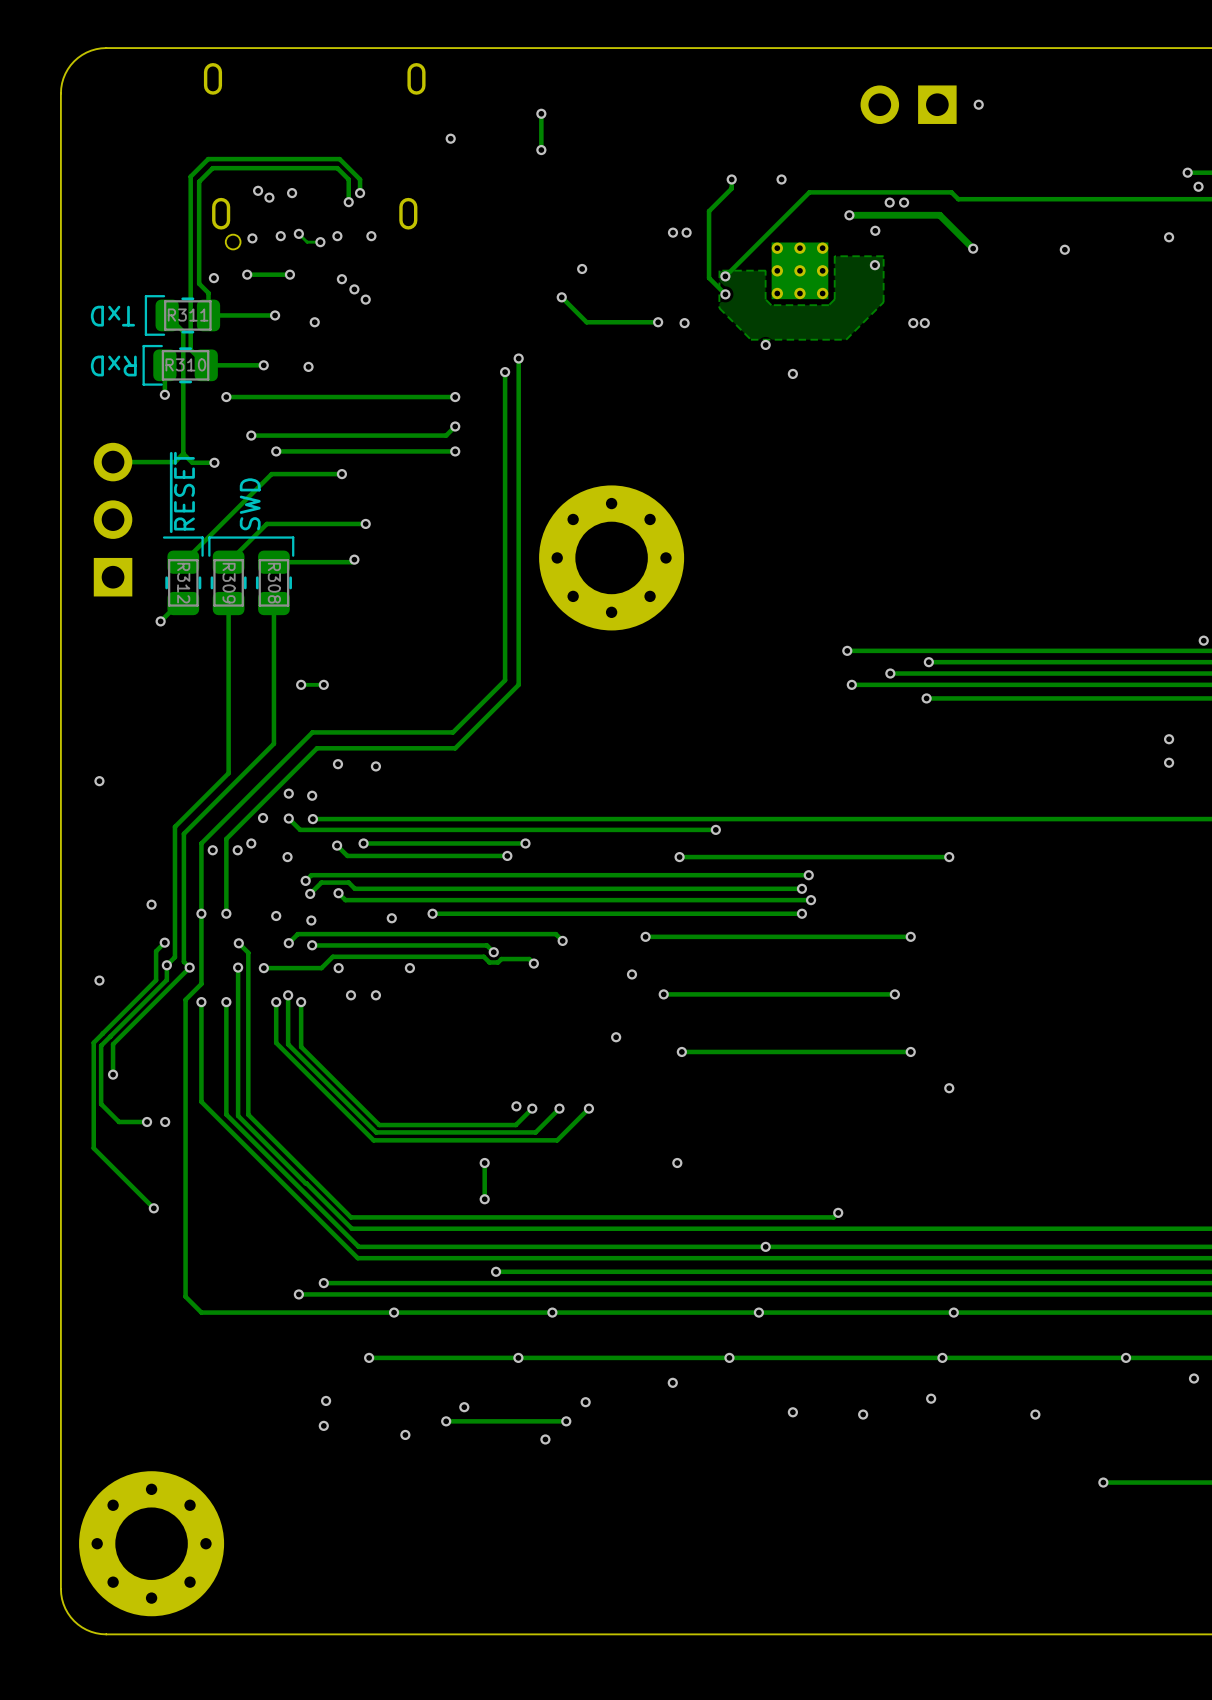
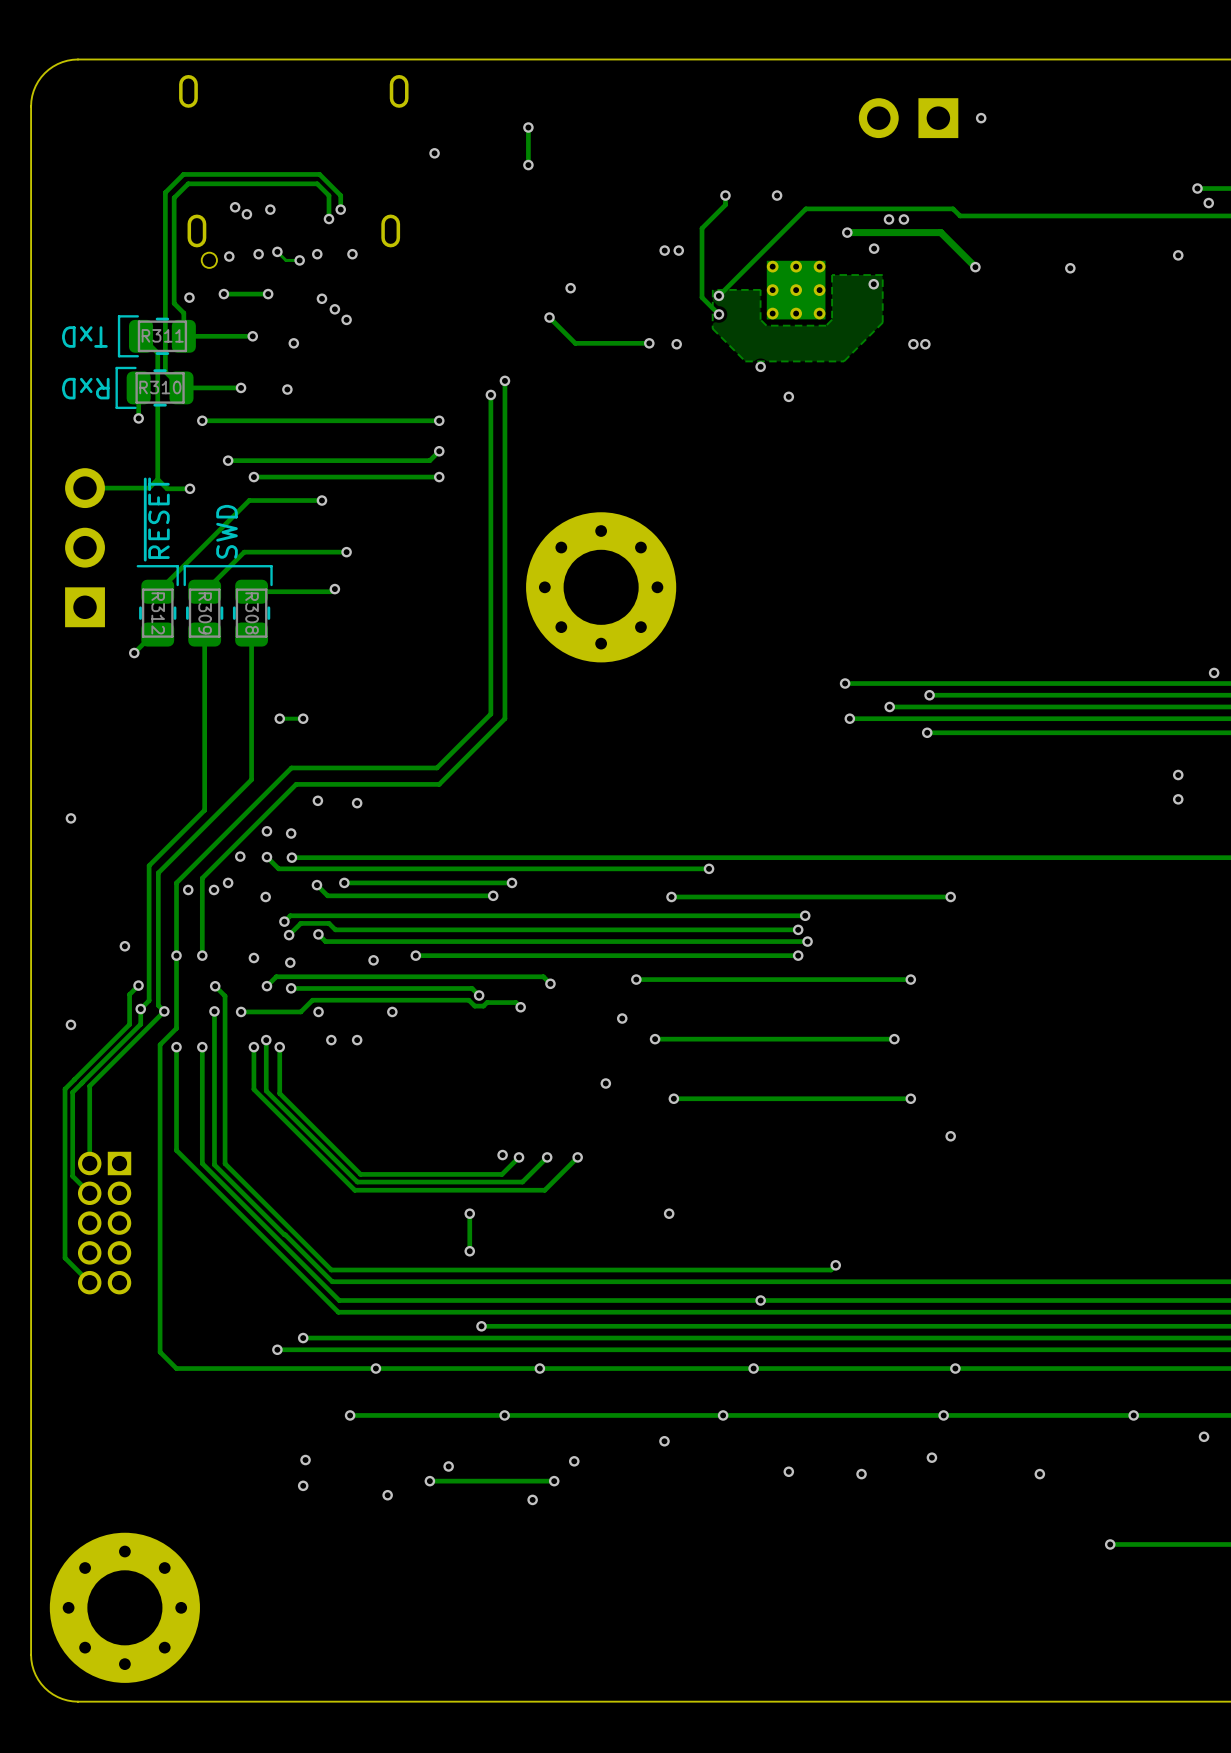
track: (117, 1039) (113, 1044) (113, 1074) -> (89, 1086) (89, 1163)
via: (113, 1074) -> none
track: (101, 1104) (119, 1121) (147, 1121) -> (72, 1152) (72, 1176) (89, 1193)
via: (147, 1121) -> none
via: (165, 1121) -> none
track: (93, 1148) (153, 1208) -> (65, 1198) (65, 1257) (89, 1282)
part: none -> (104, 1223)
via: (153, 1208) -> none

